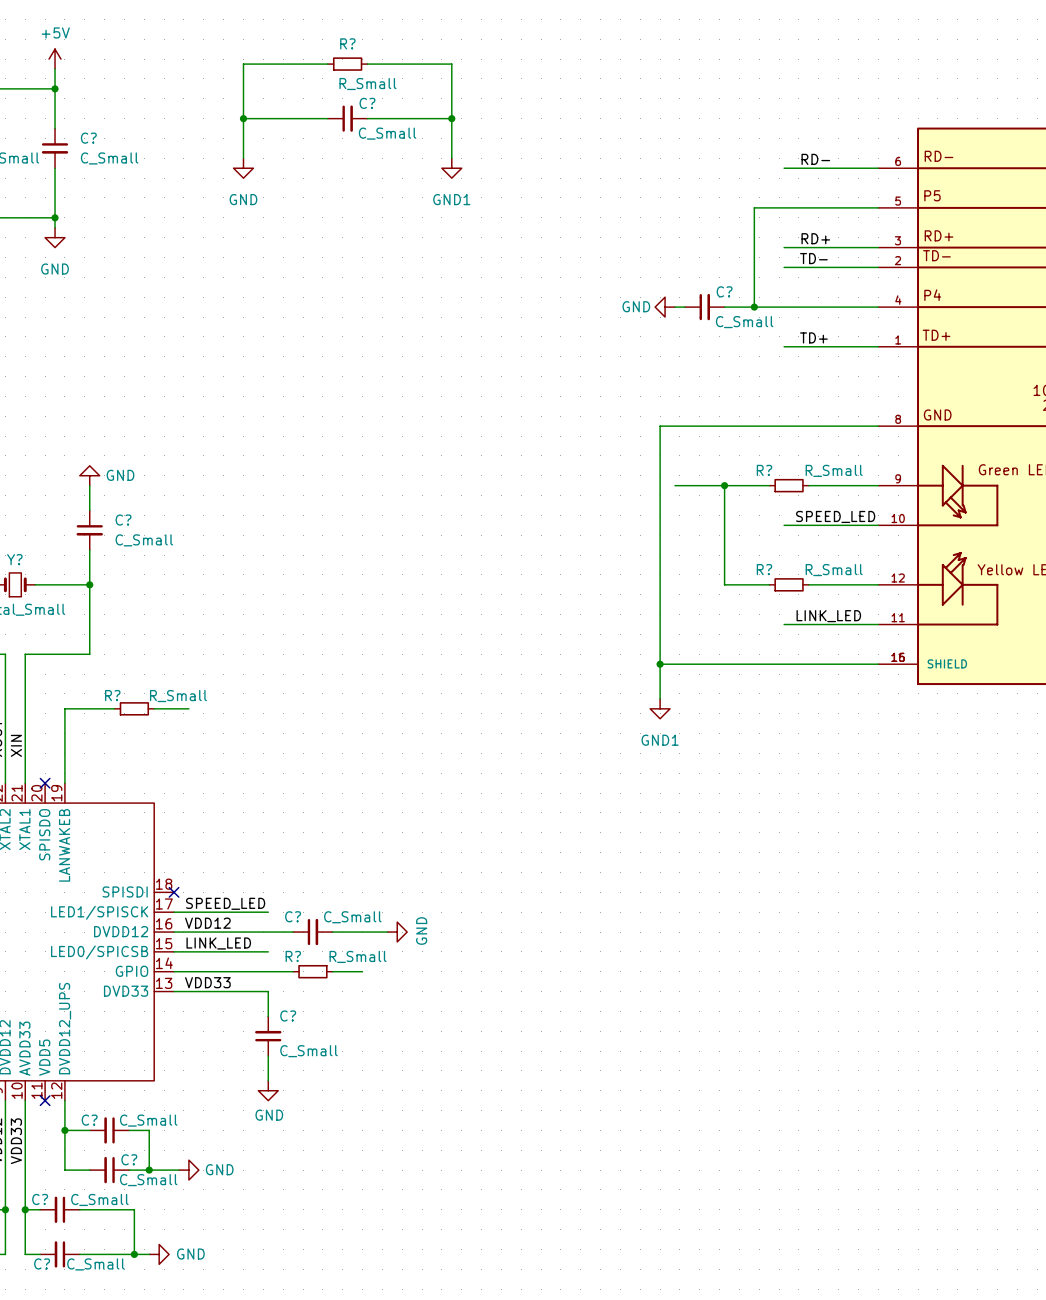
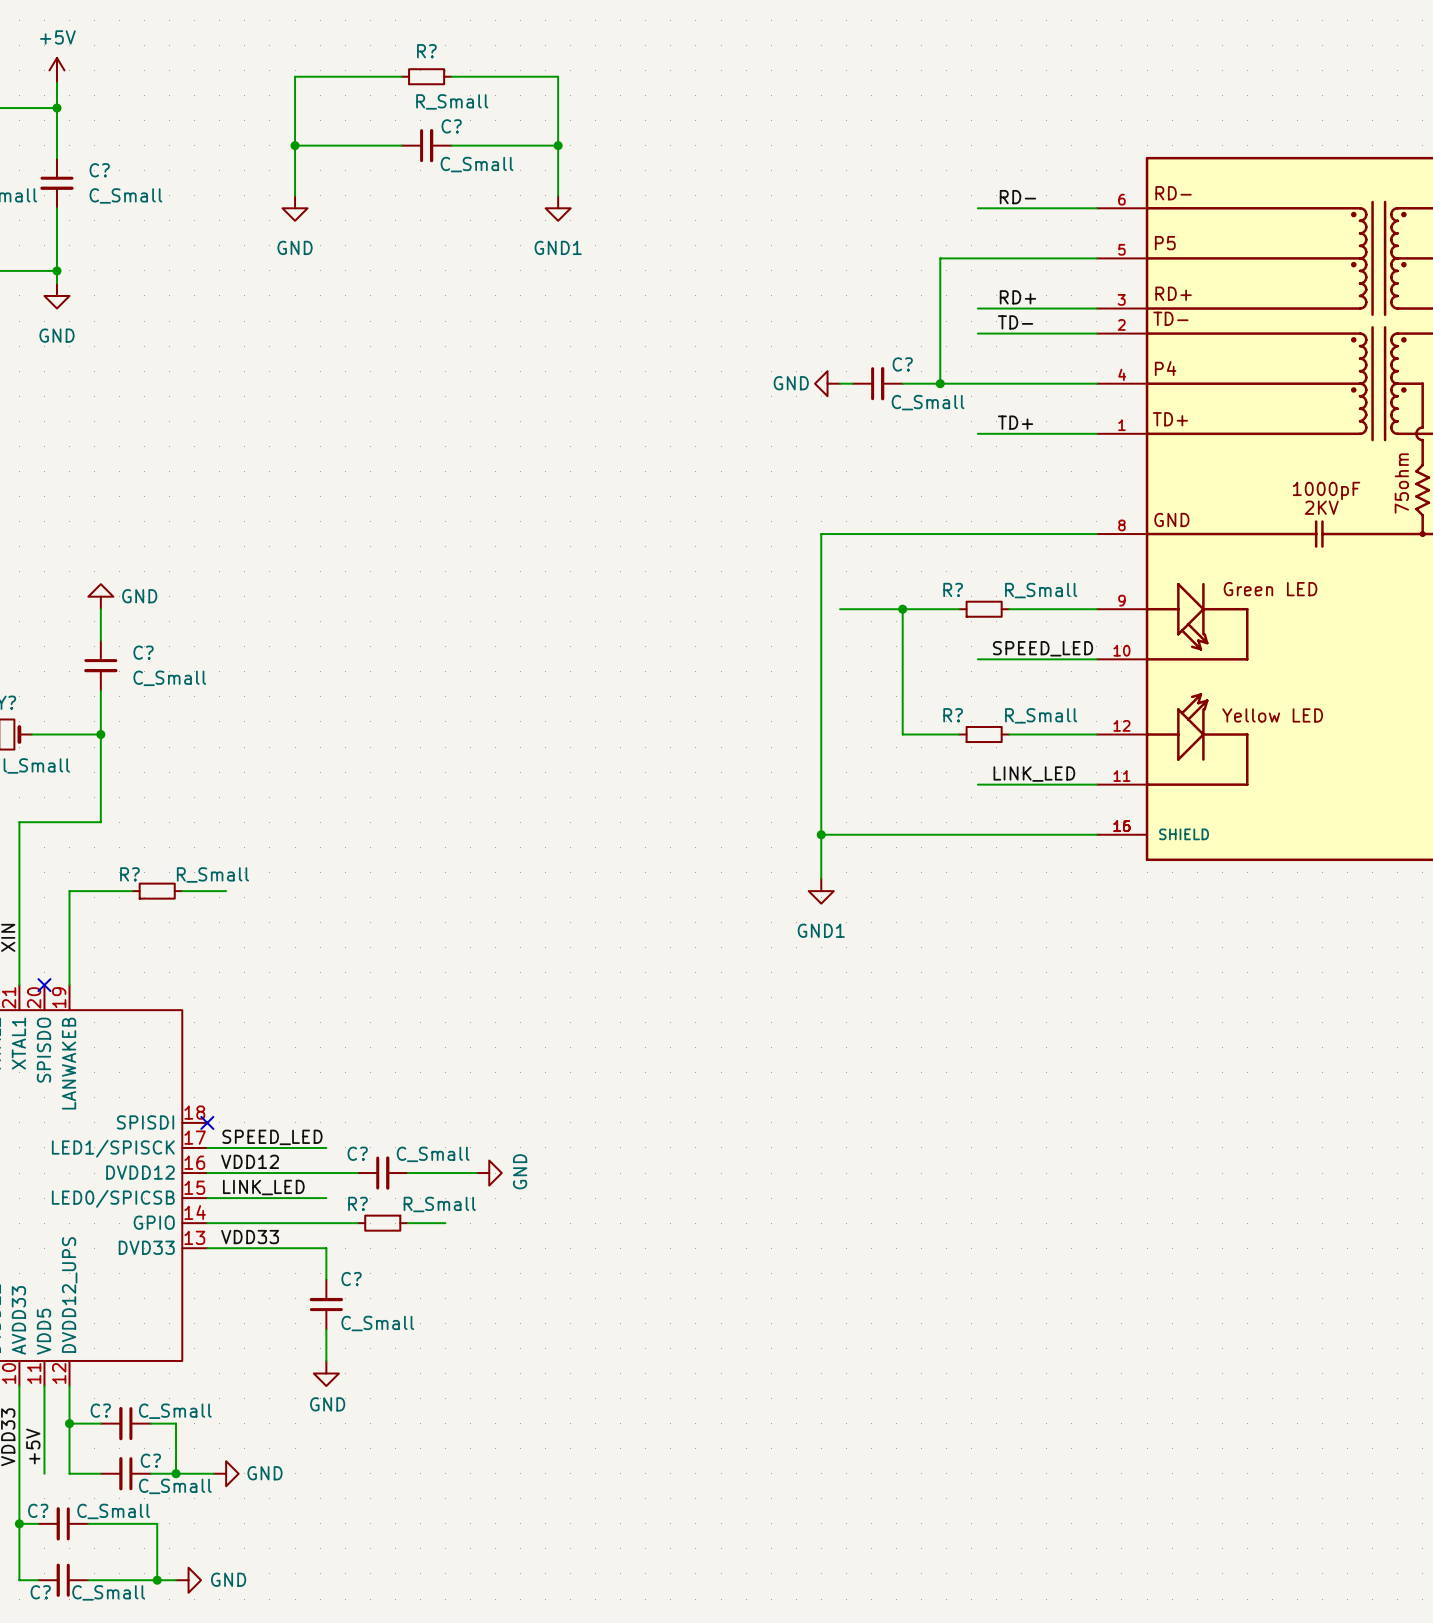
wire: none -> (44, 1386) (44, 1473)
no-connect mark: (45, 1100) -> none
label: none -> +5V (33, 1446)

